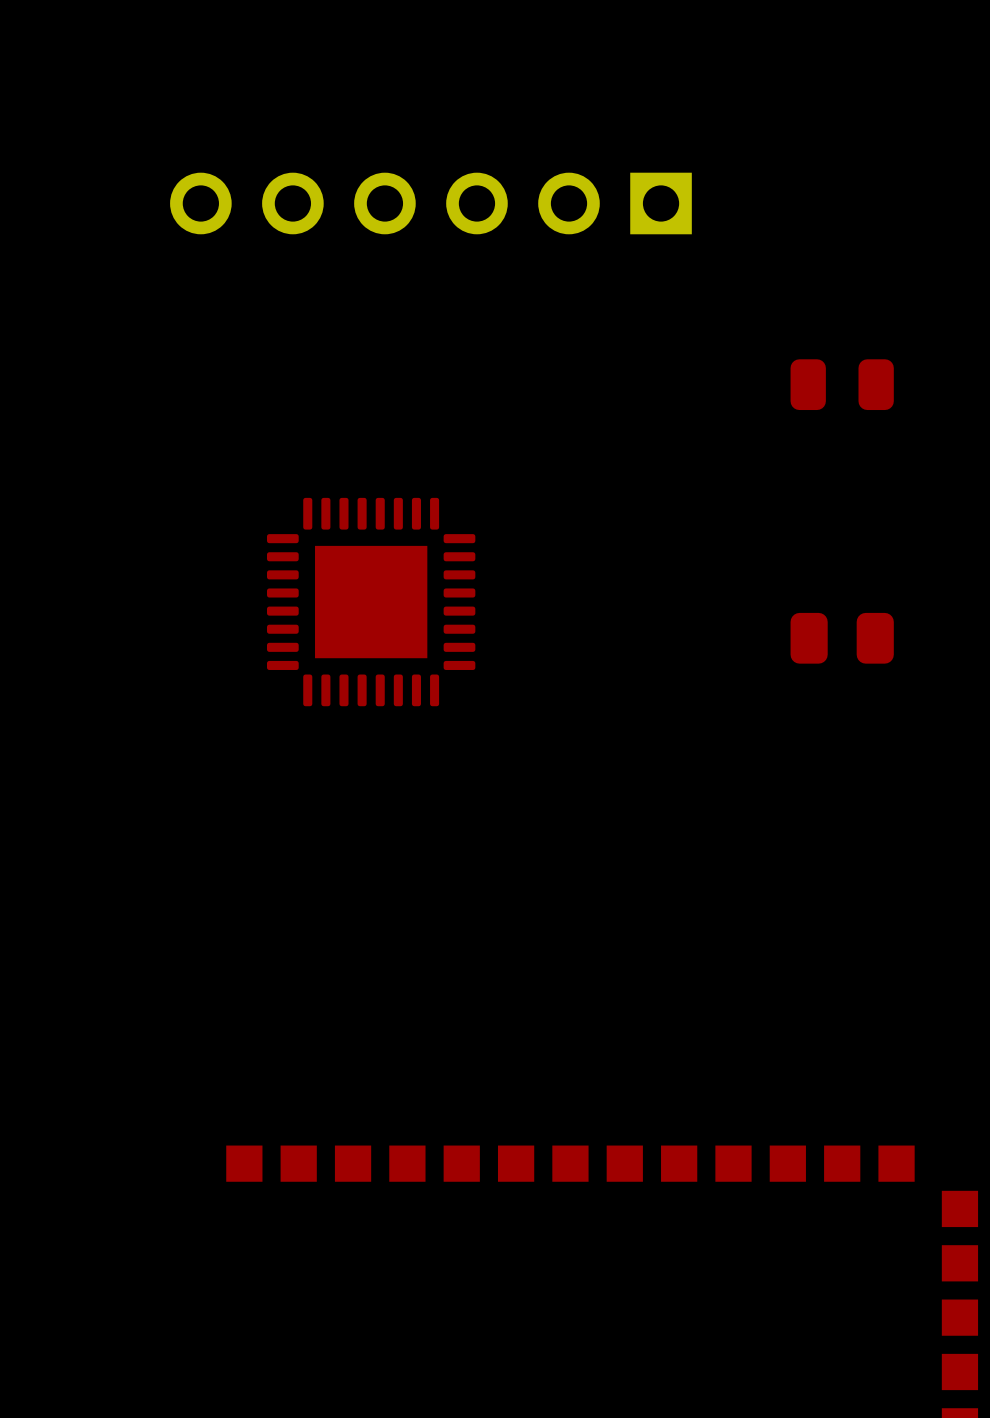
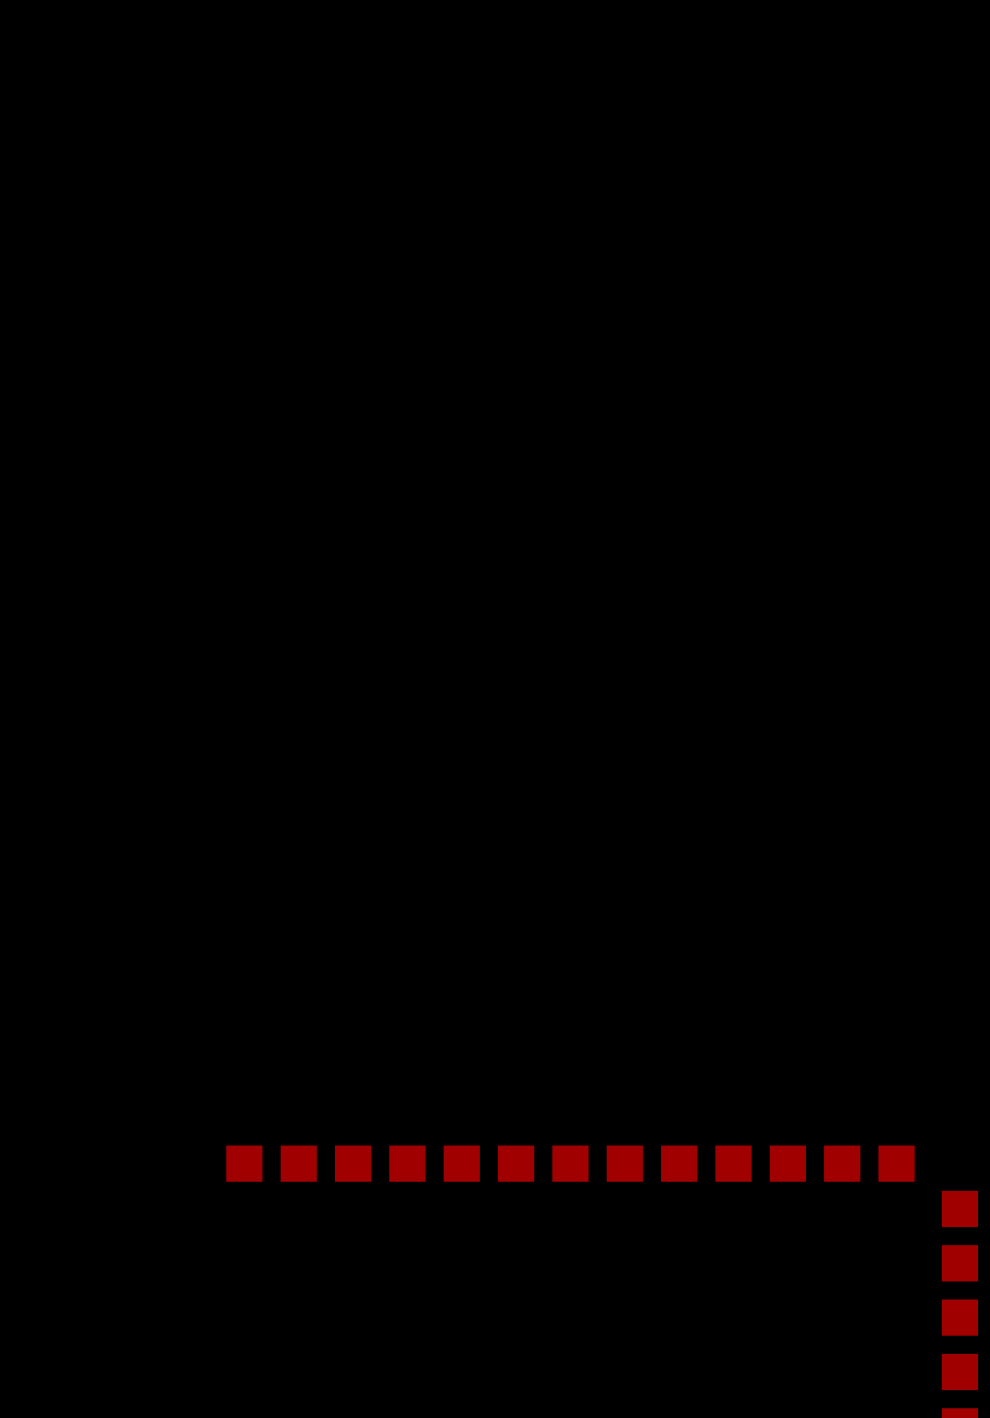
part: (430, 203) -> none
part: (842, 384) -> none
part: (371, 602) -> none
part: (842, 638) -> none

